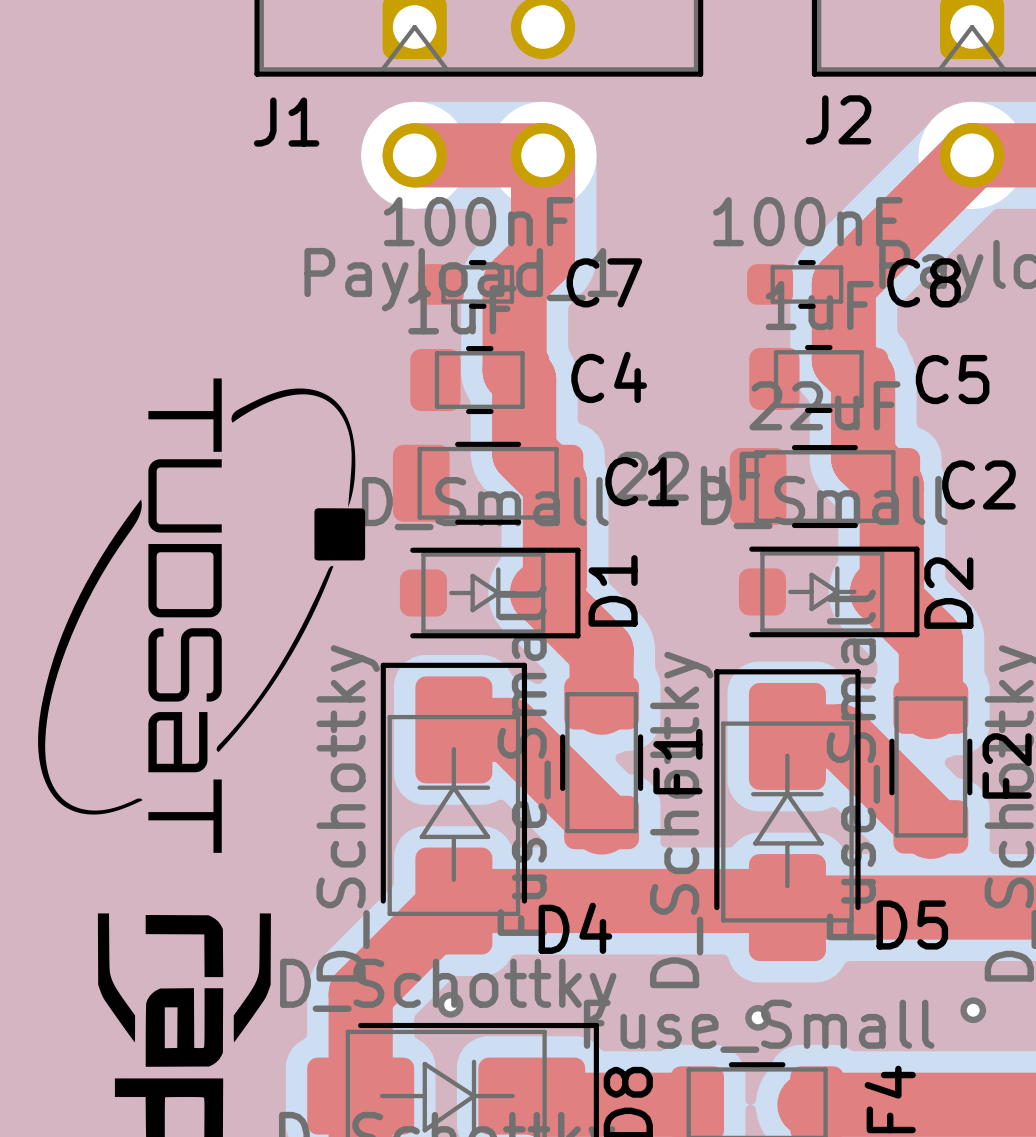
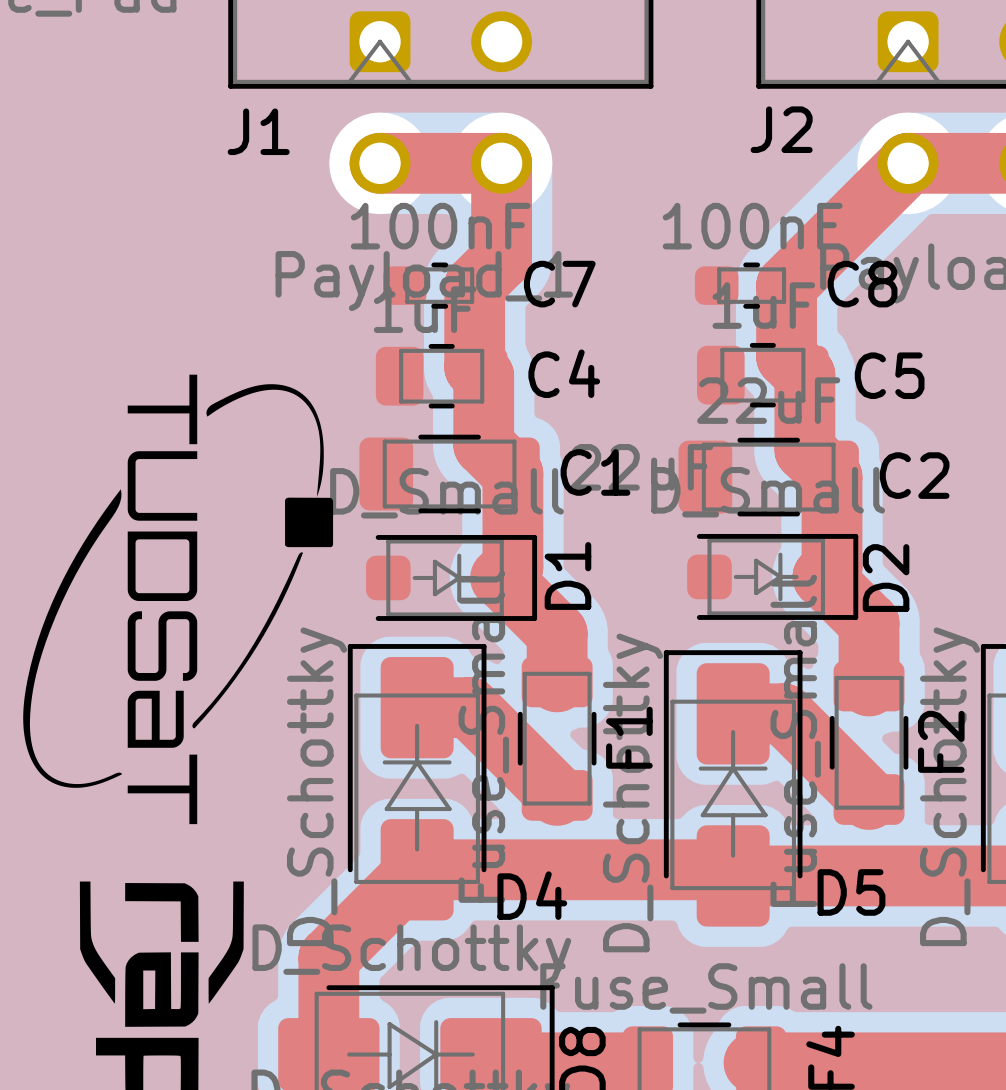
via: (450, 1004) -> none
via: (973, 1010) -> none
via: (758, 1017) -> none

